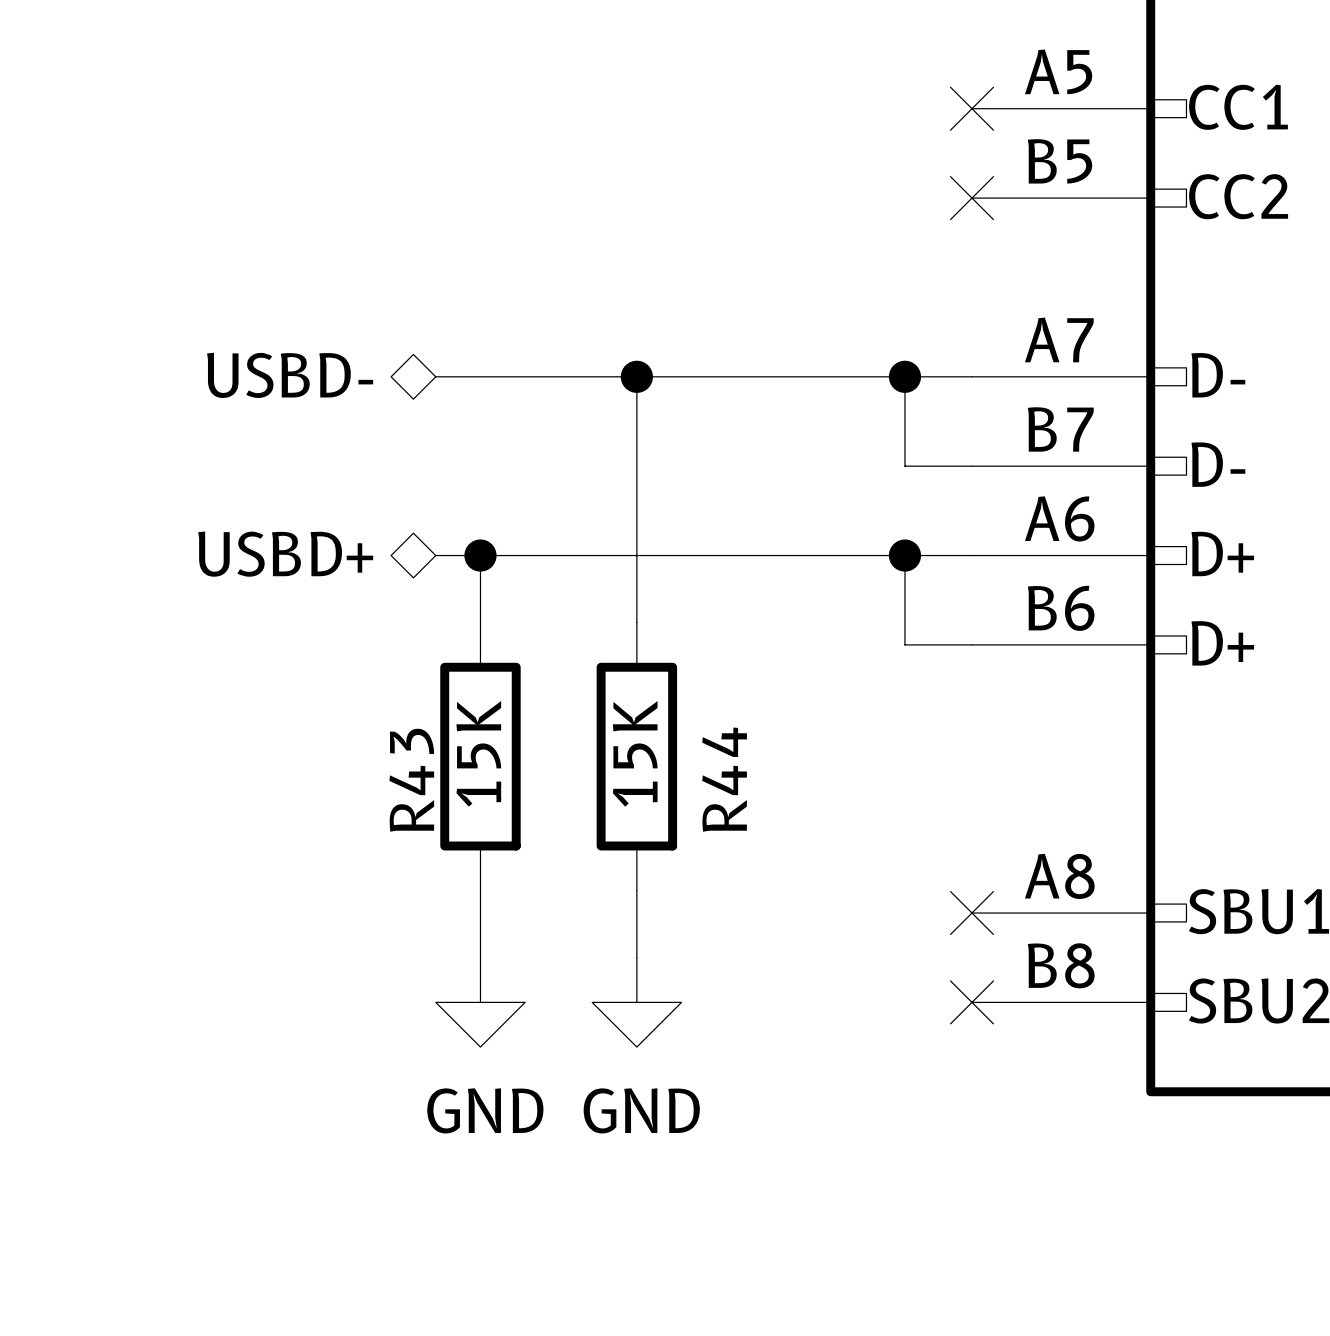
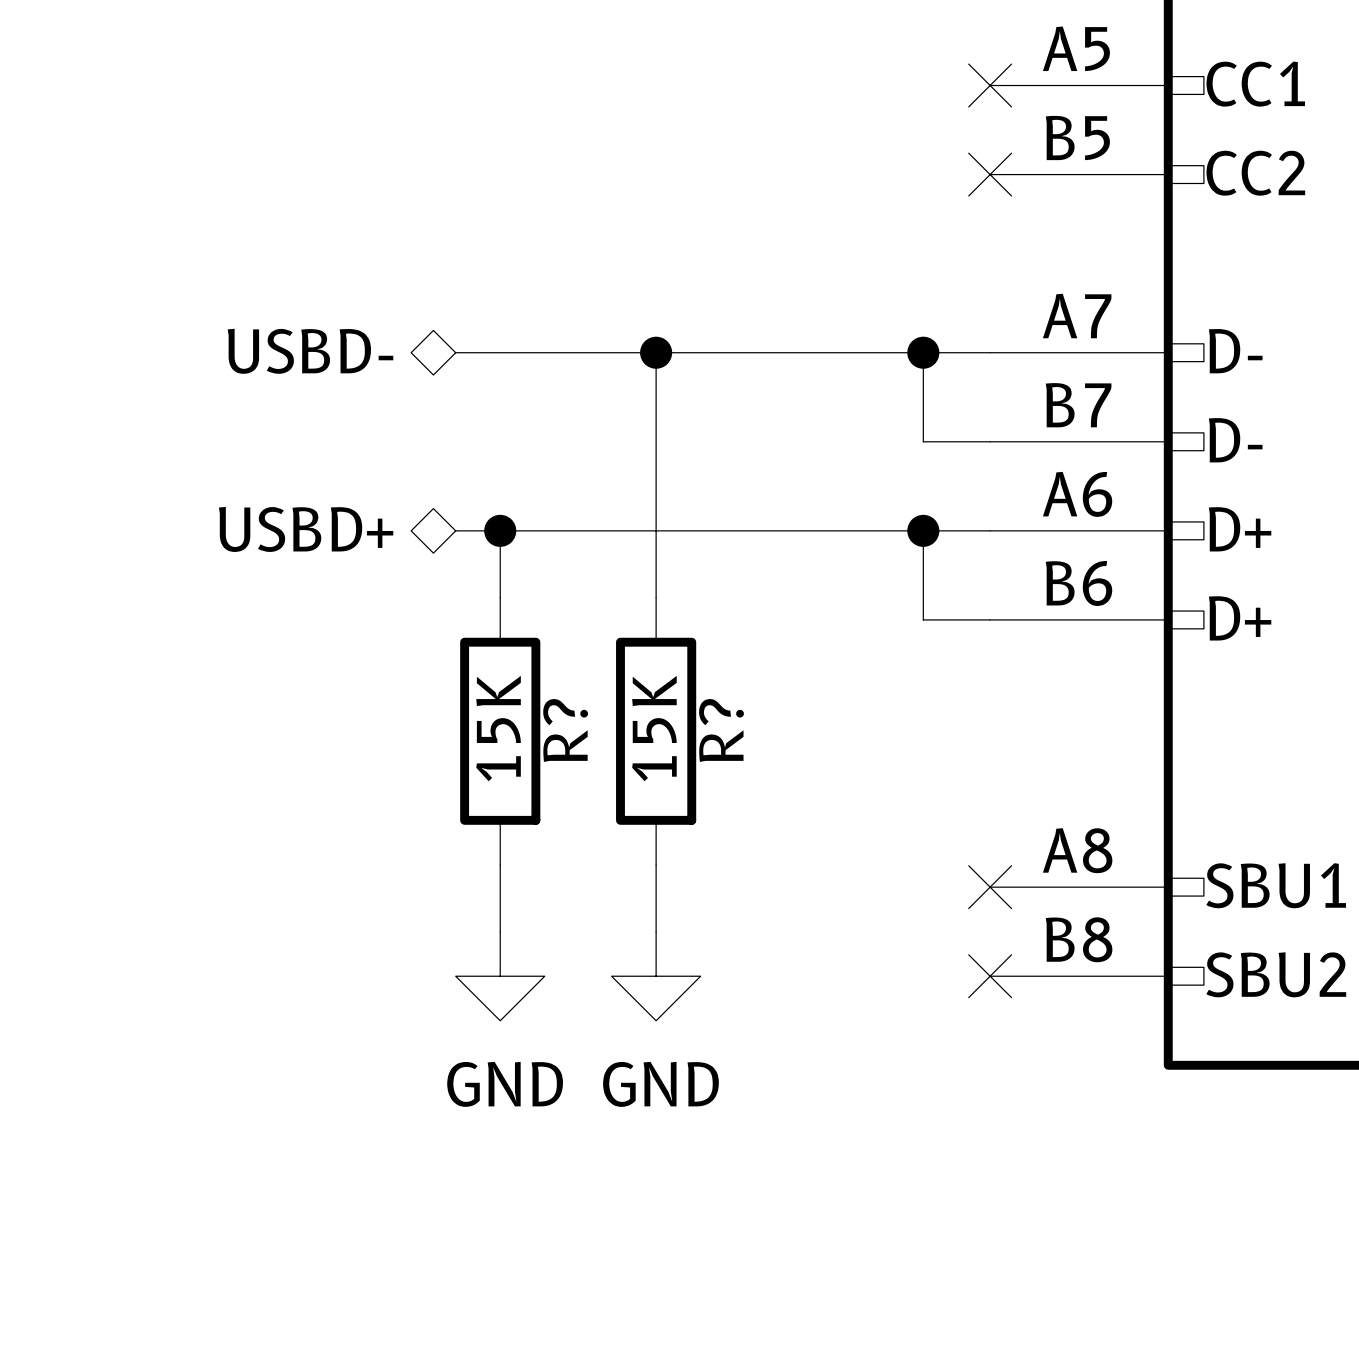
R44 name: R44 (724, 779) -> R? (721, 730)
R43 name: R43 (411, 780) -> R? (565, 730)

